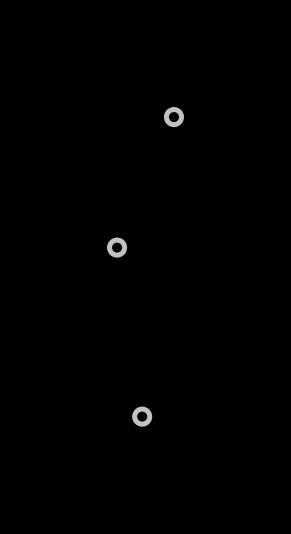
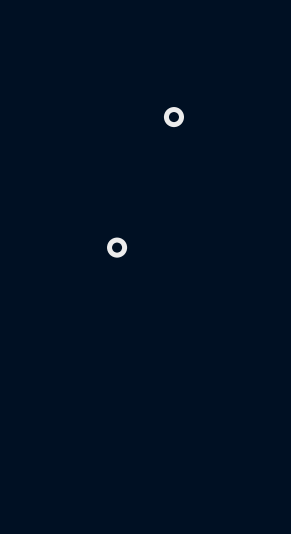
via: (142, 416) -> none

